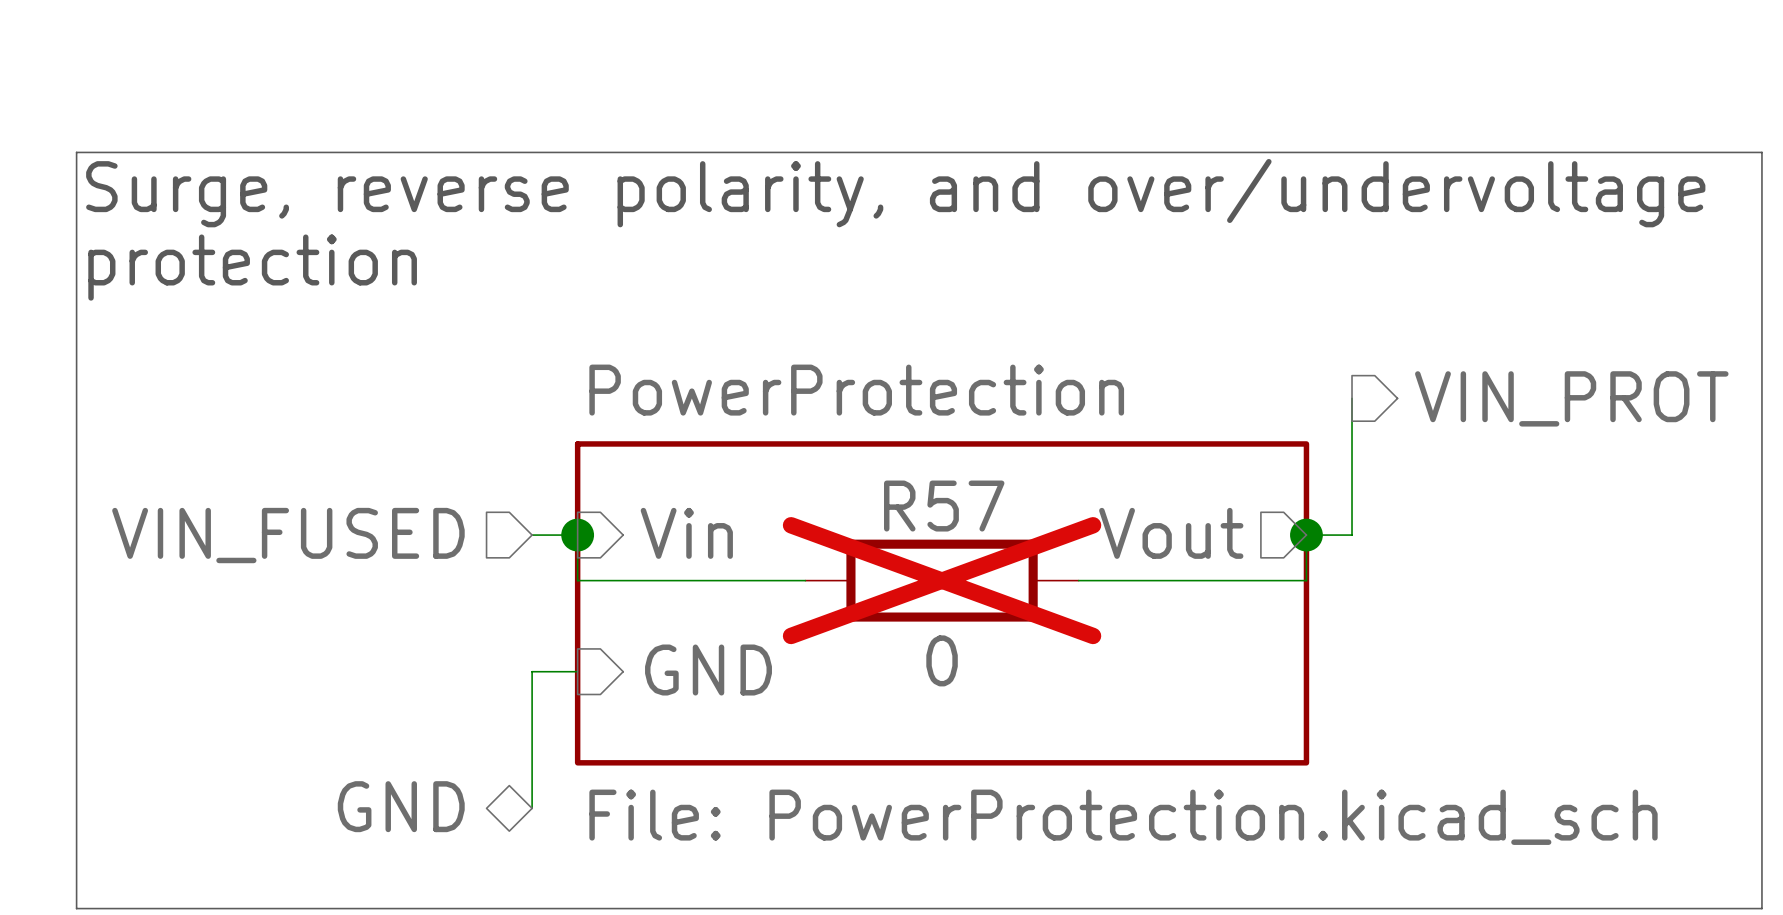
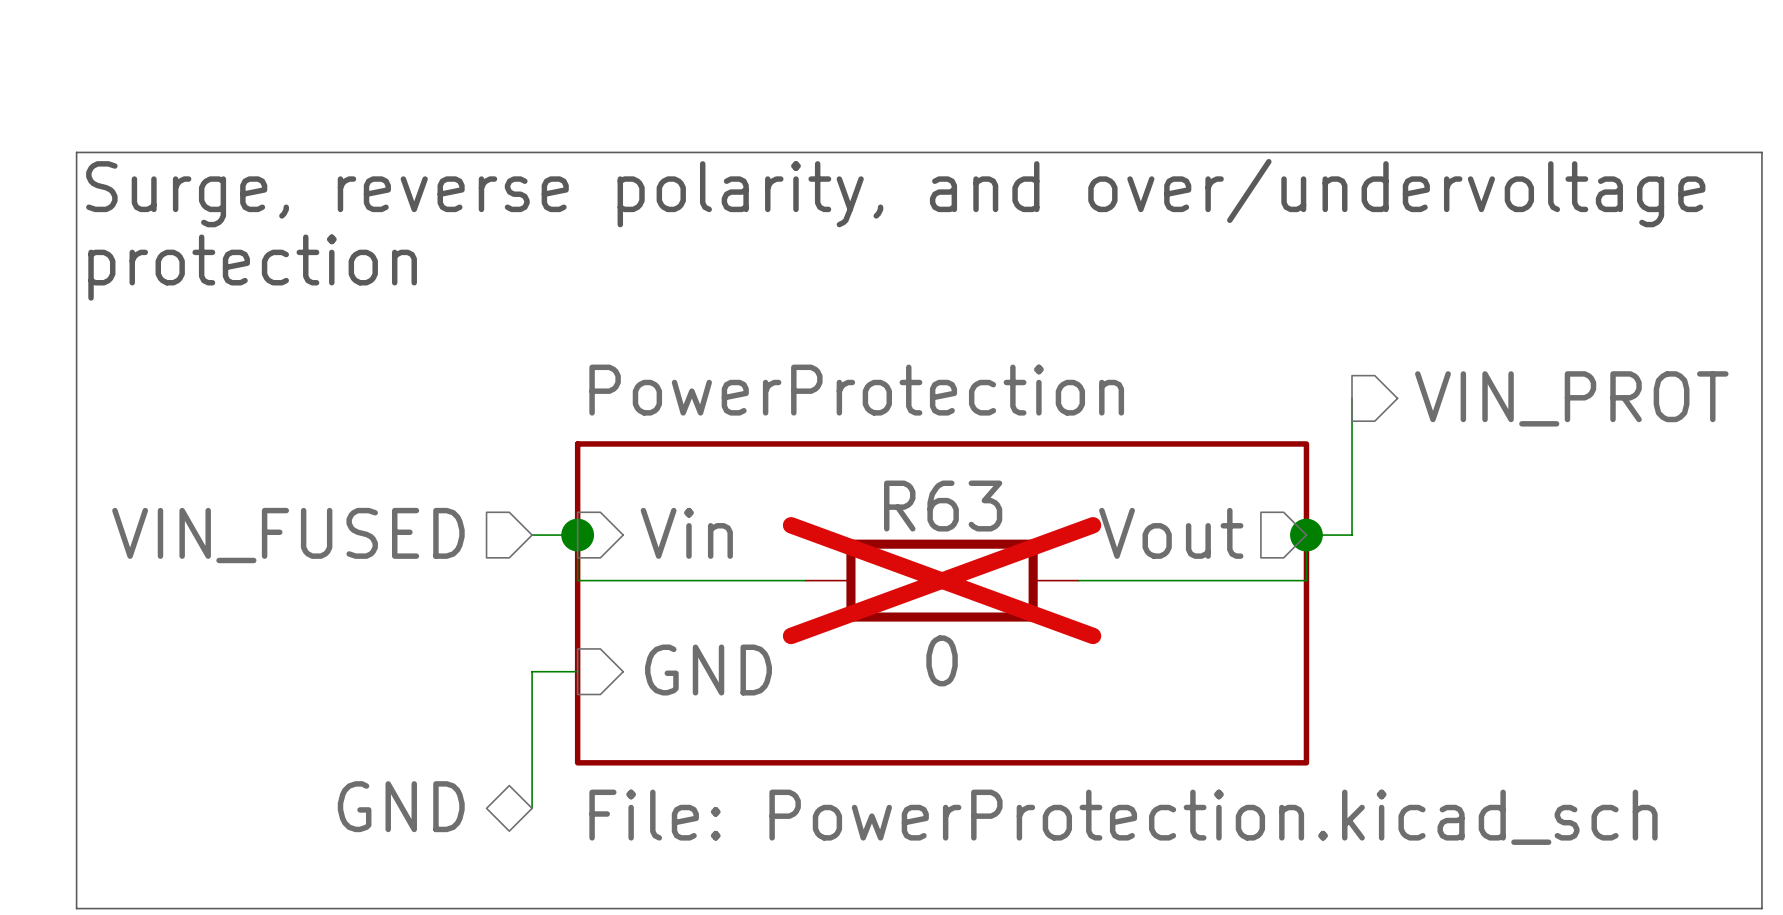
R57 name: R57 (944, 506) -> R63 (943, 506)

